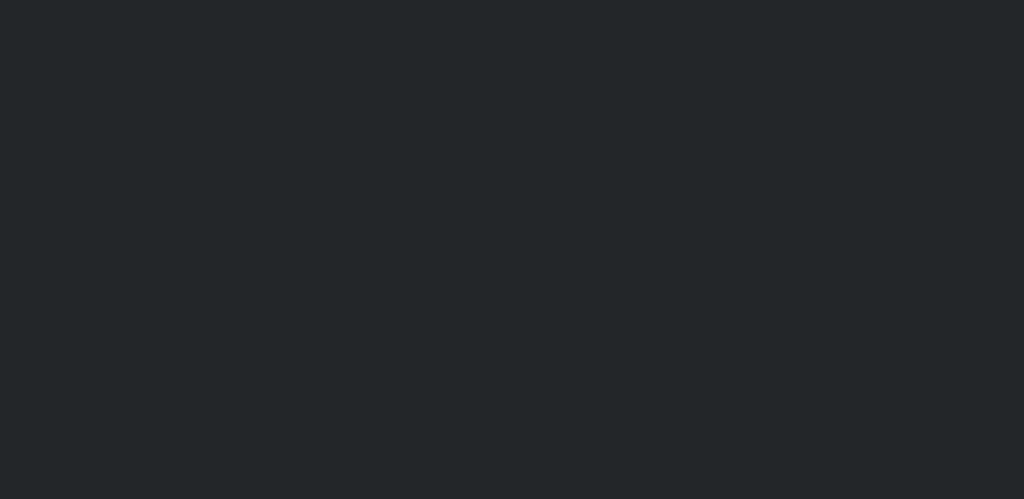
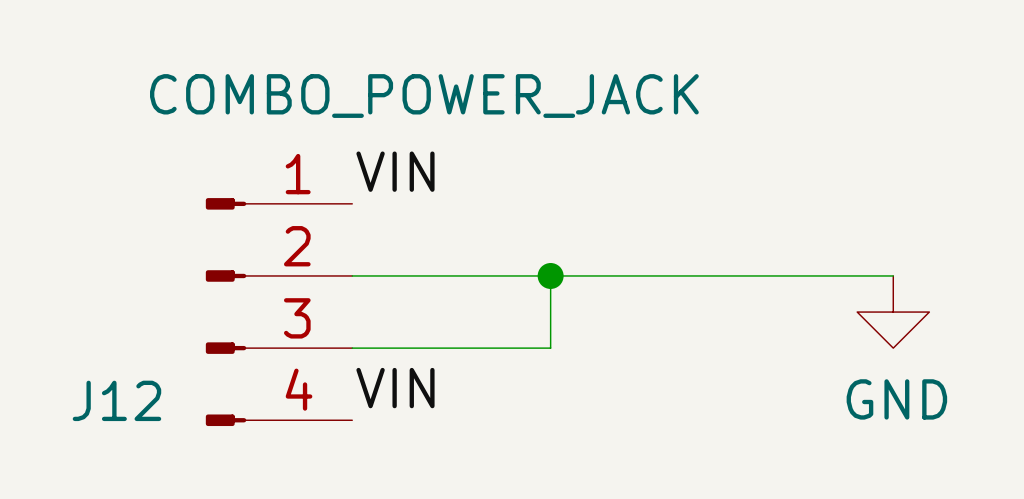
label: none -> VIN (395, 171)
wire: none -> (352, 275) (893, 275)
wire: none -> (550, 275) (550, 348) (352, 348)
junction: none -> (550, 275)
J12: none -> COMBO_POWER_JACK (279, 312)
power symbol: none -> GND (893, 312)
label: none -> VIN (395, 388)

